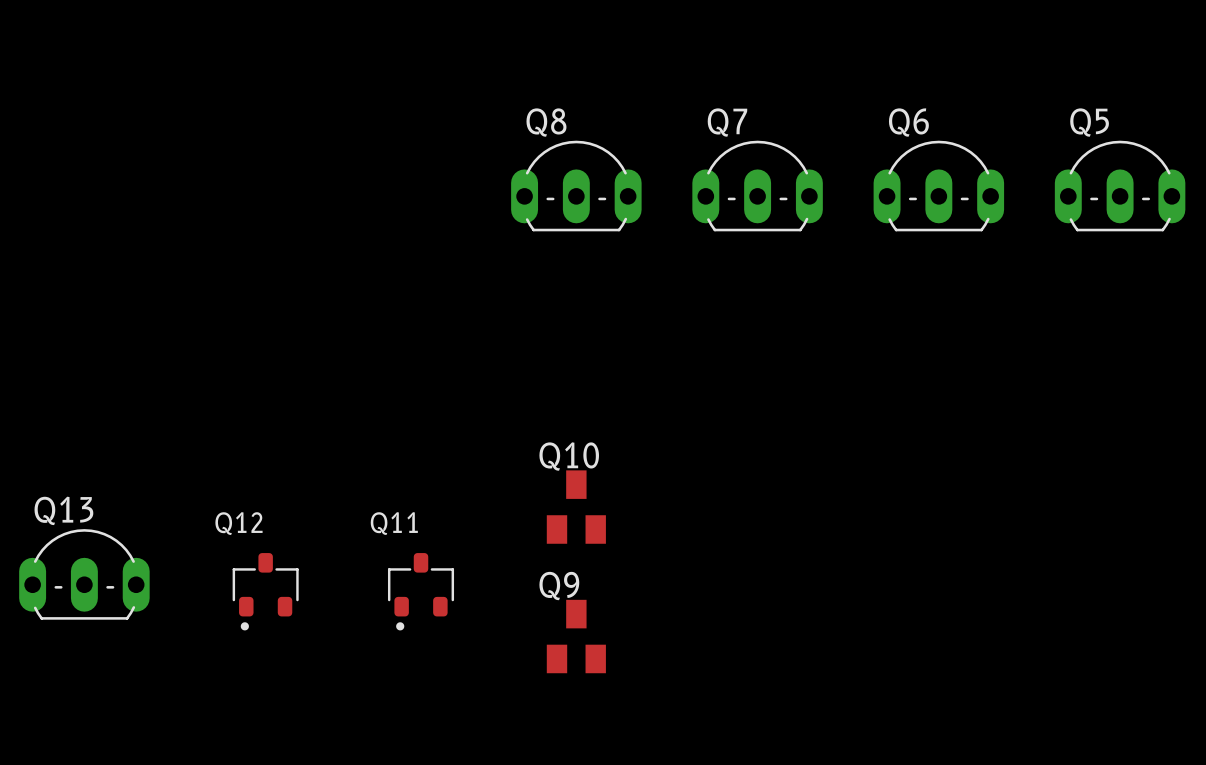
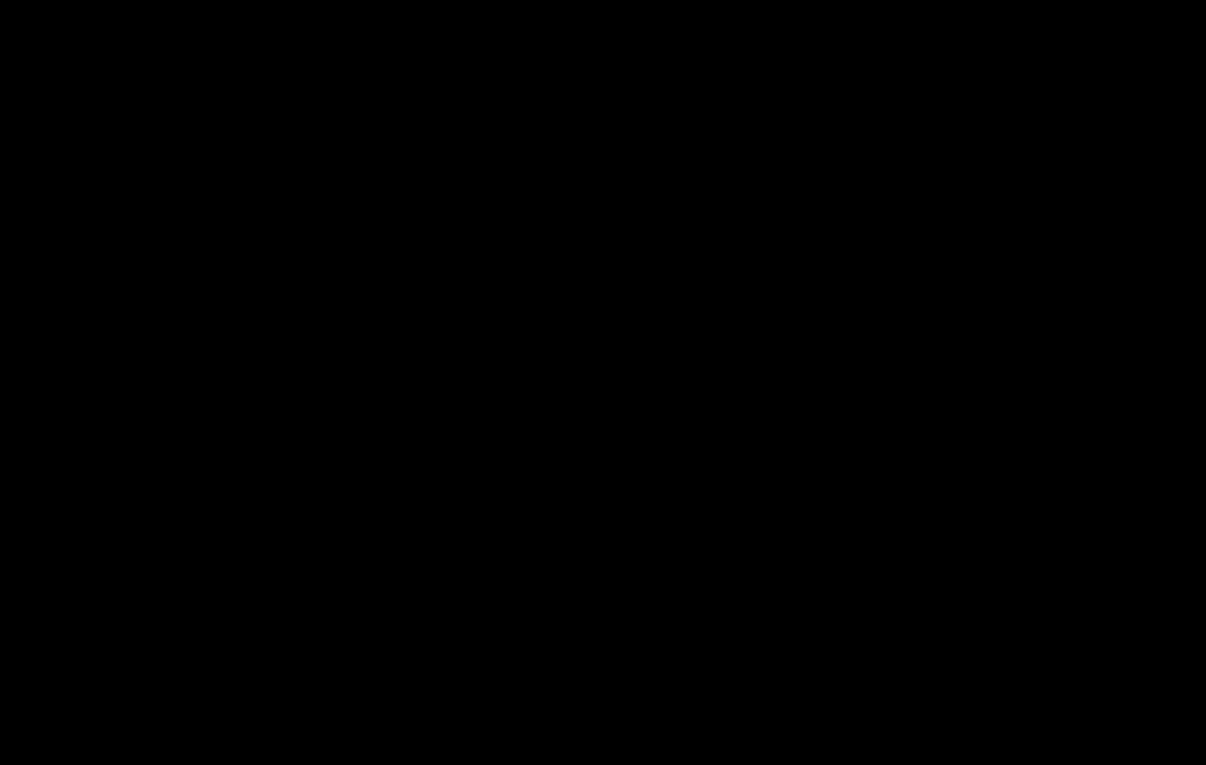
Q8: (576, 186) -> none
Q7: (757, 186) -> none
Q6: (938, 186) -> none
Q5: (1120, 186) -> none
Q10: (576, 507) -> none
Q13: (84, 574) -> none
Q12: (265, 591) -> none
Q11: (421, 591) -> none
Q9: (576, 636) -> none

